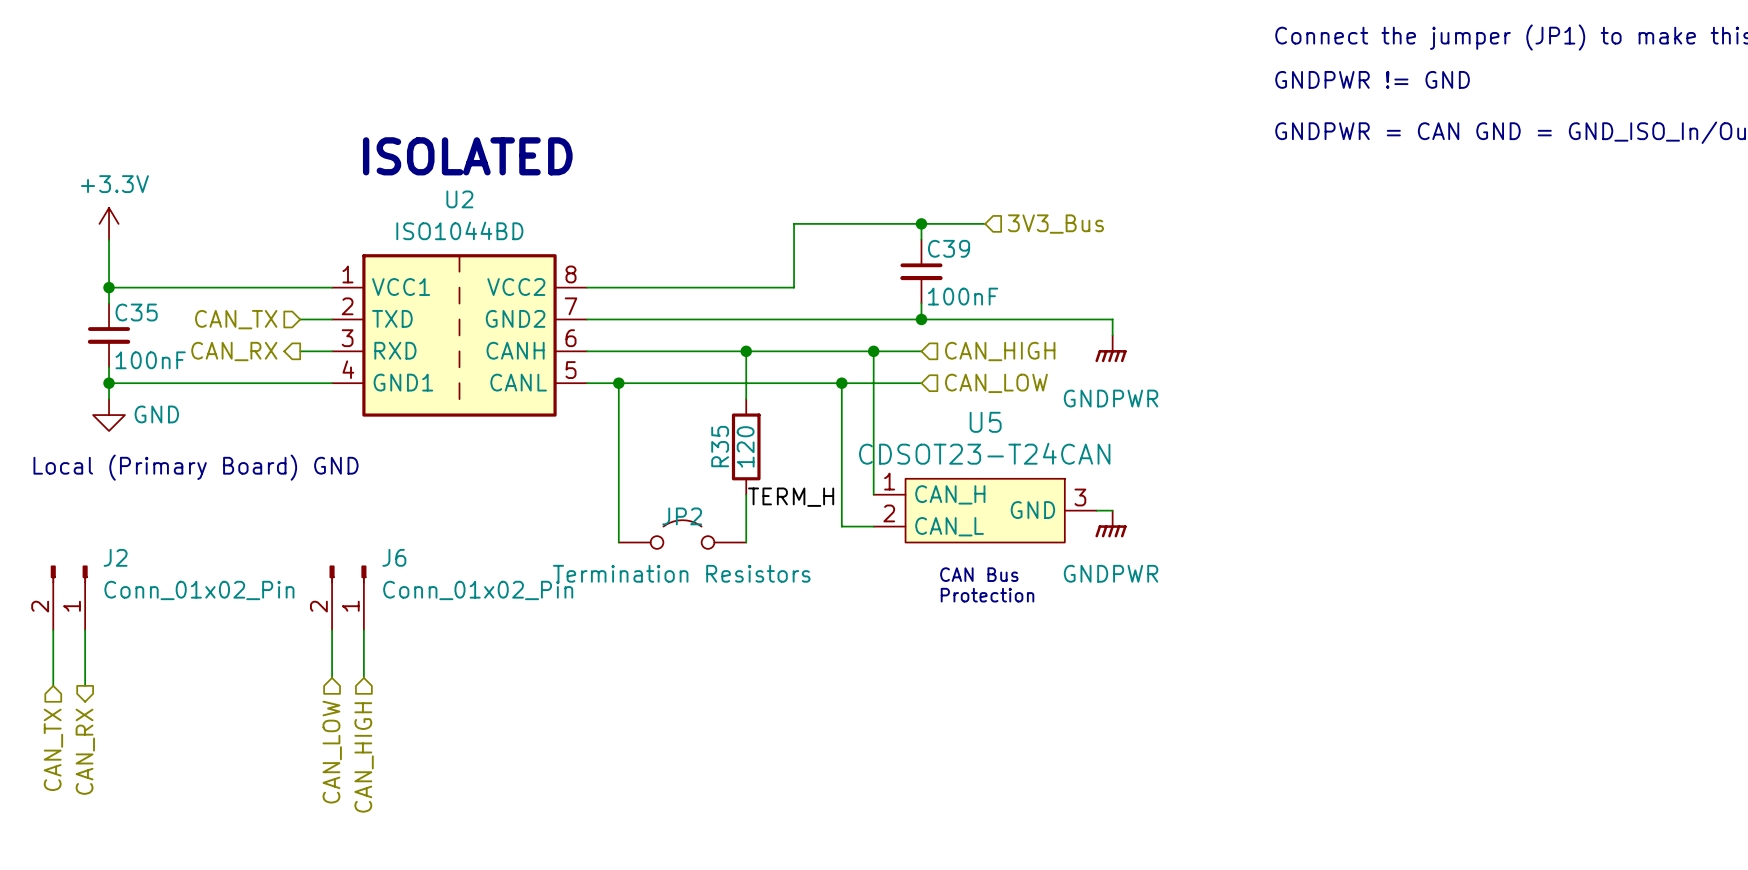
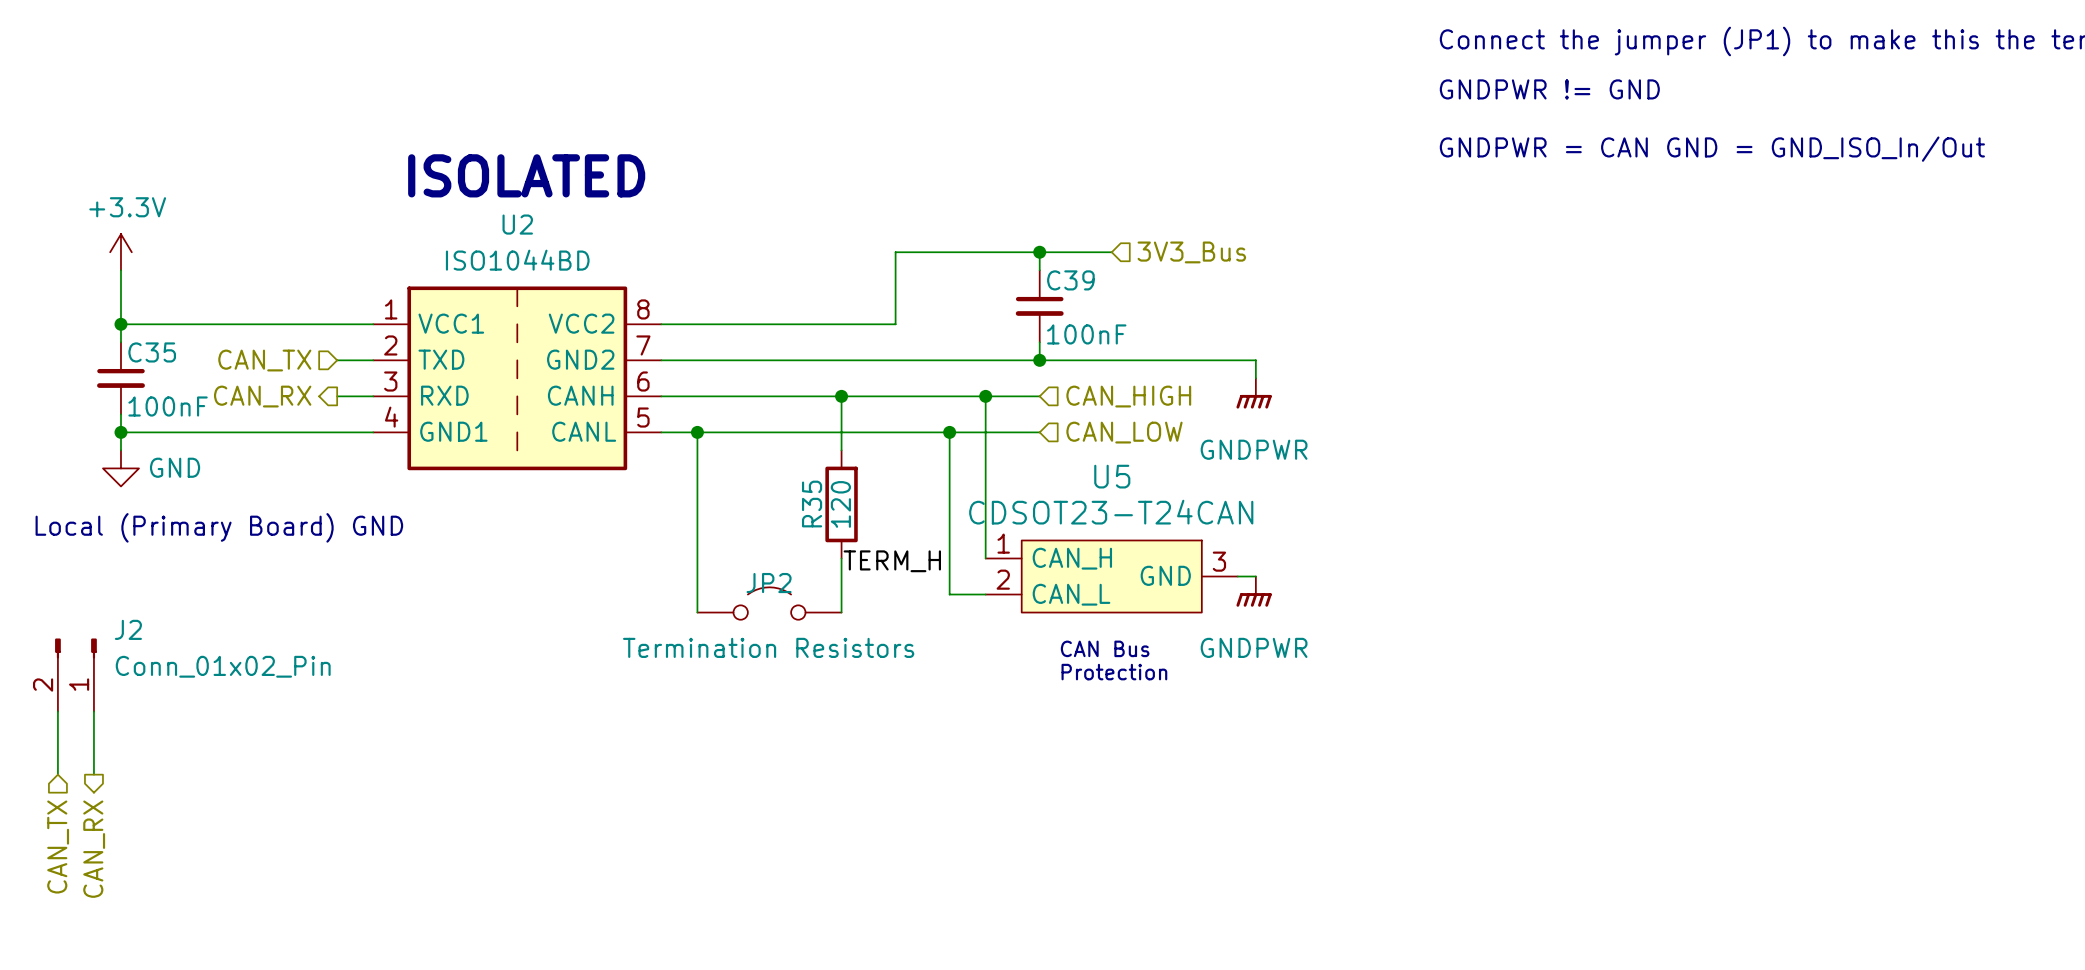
J6: Conn_01x02_Pin (347, 597) -> none
wire: (332, 630) (332, 677) -> none
wire: (363, 630) (363, 677) -> none
hierarchical label: CAN_LOW (332, 752) -> none
hierarchical label: CAN_HIGH (364, 757) -> none

